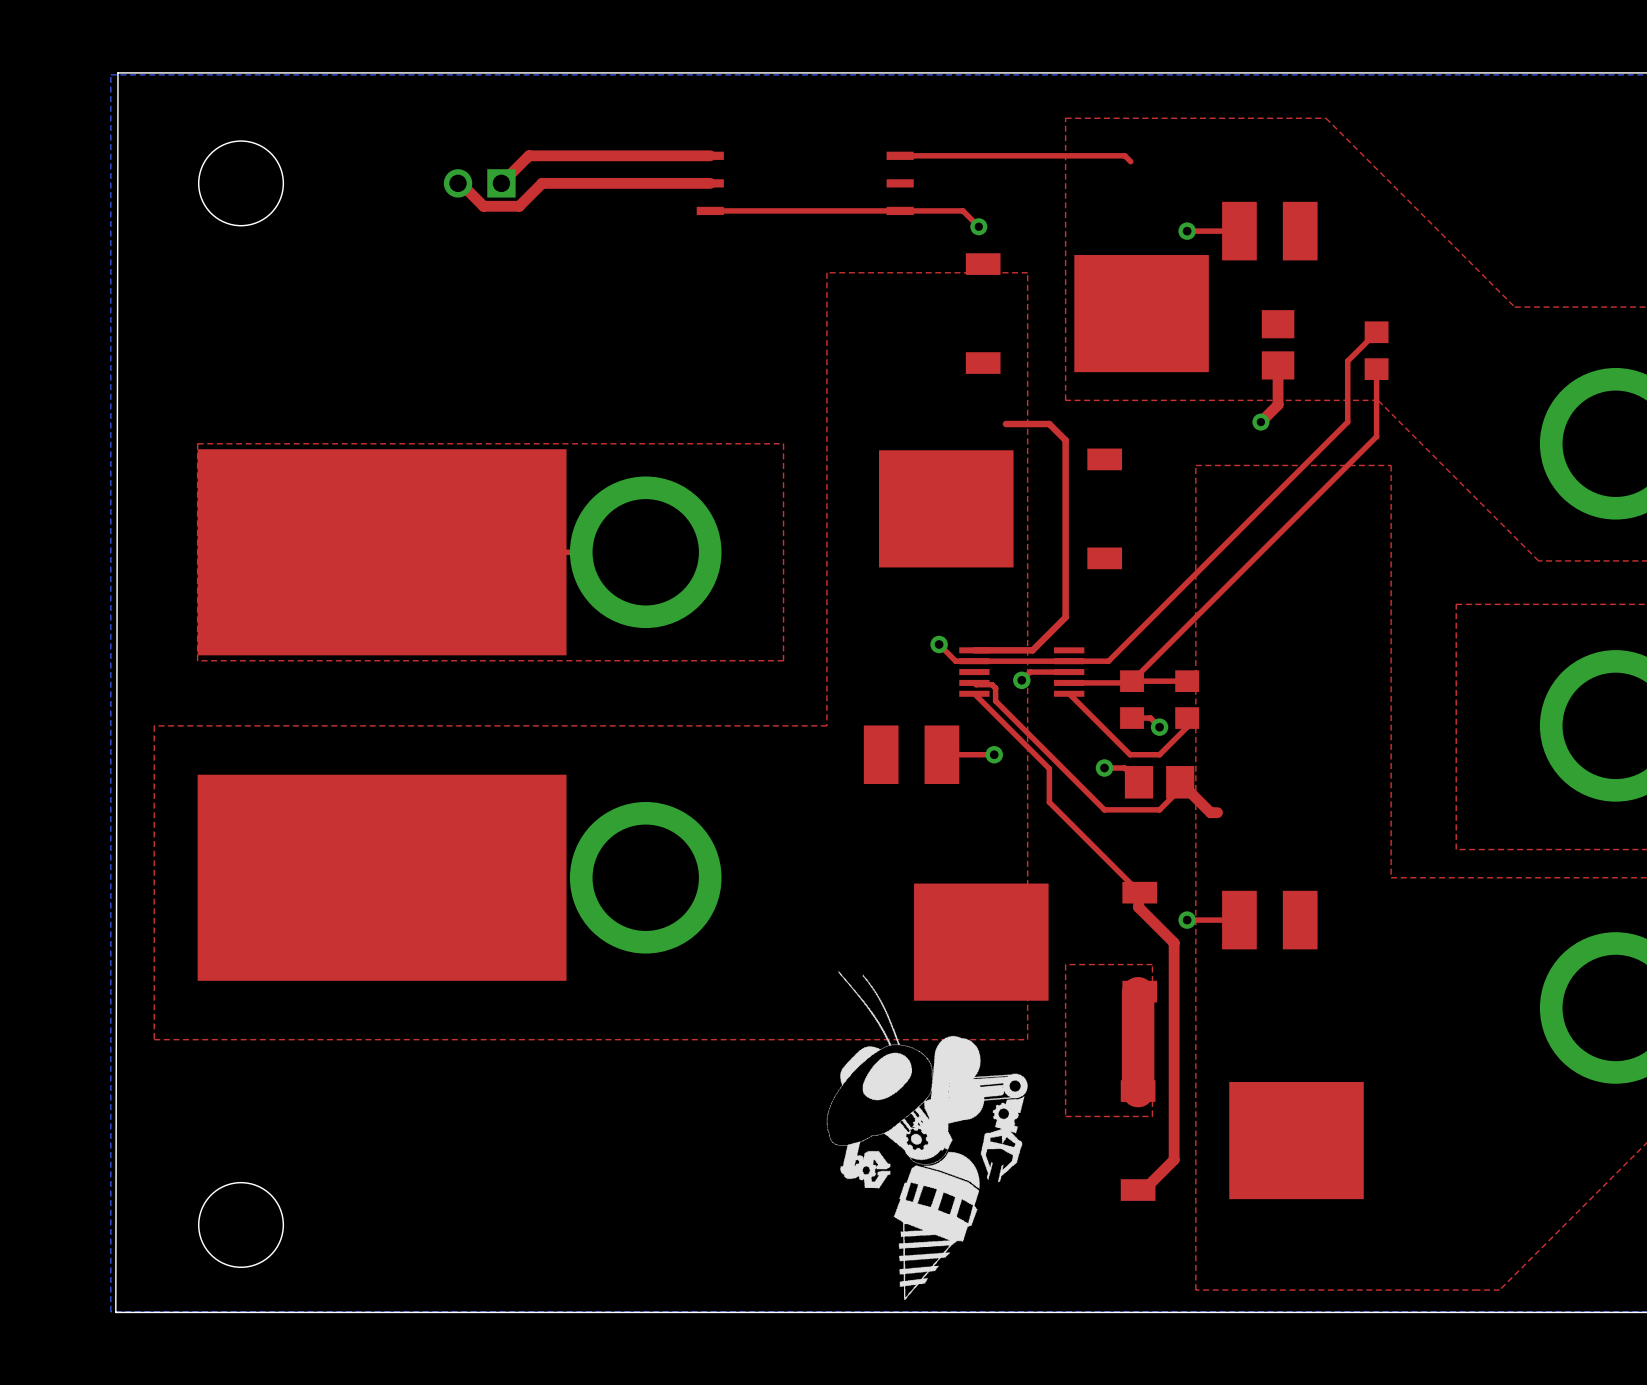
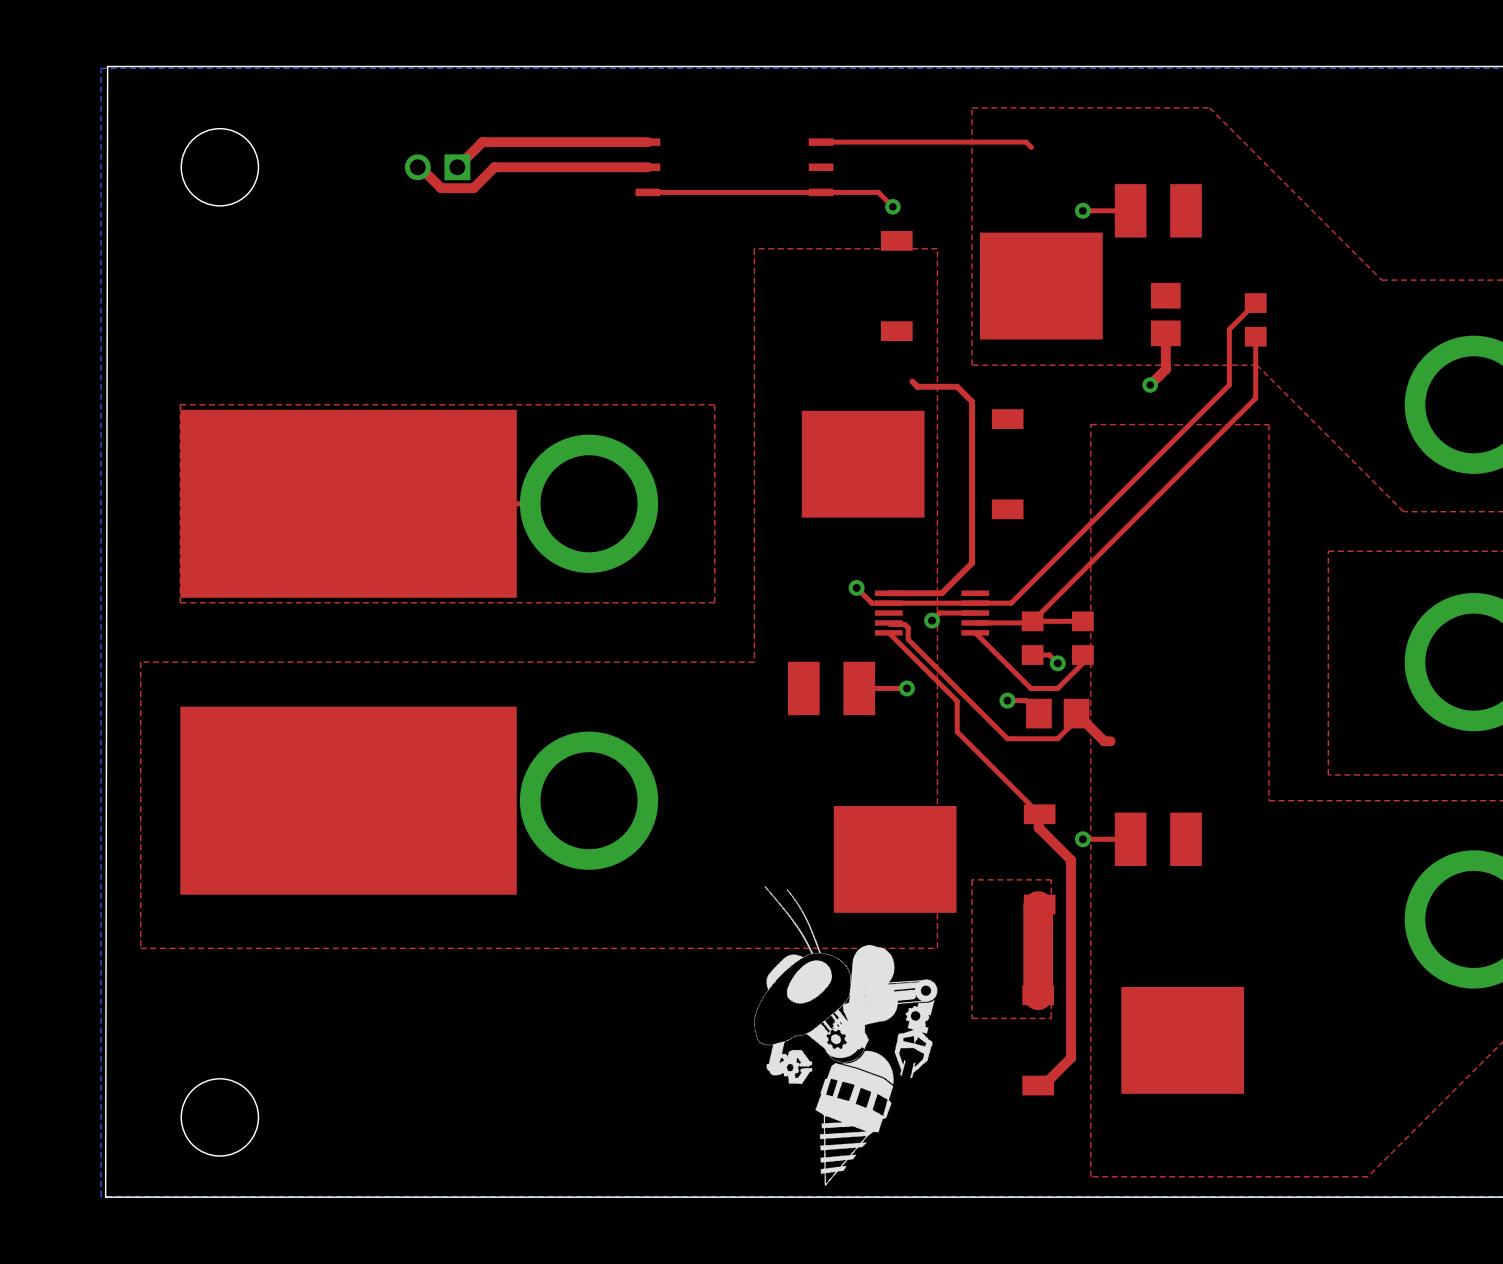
top track: none -> (912, 381) (917, 386)

